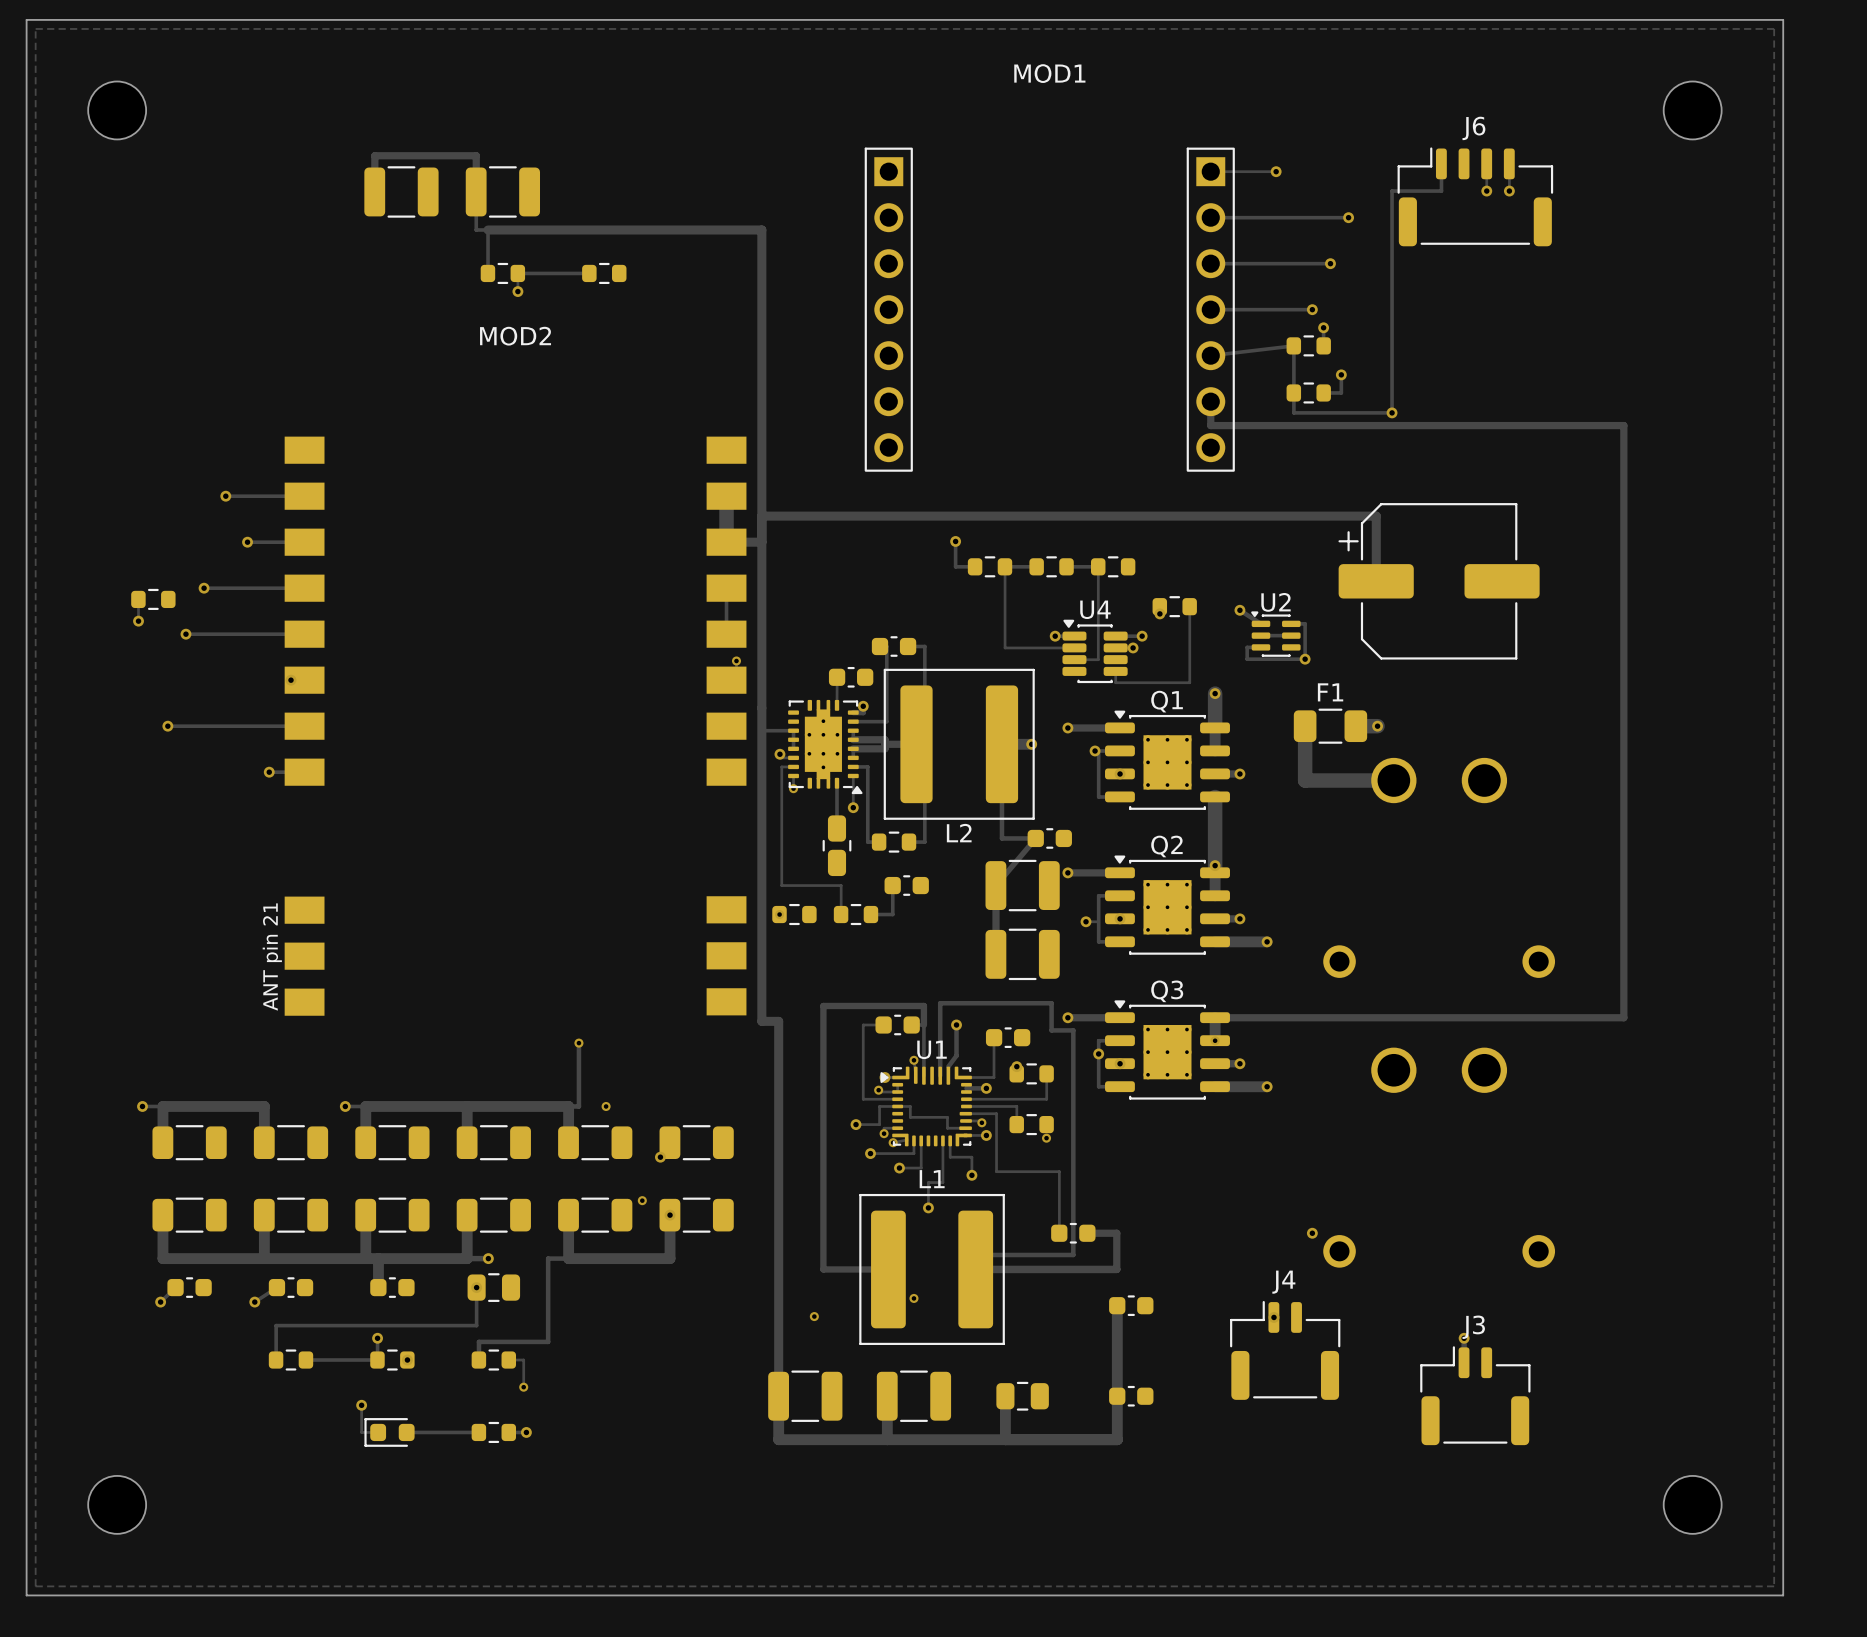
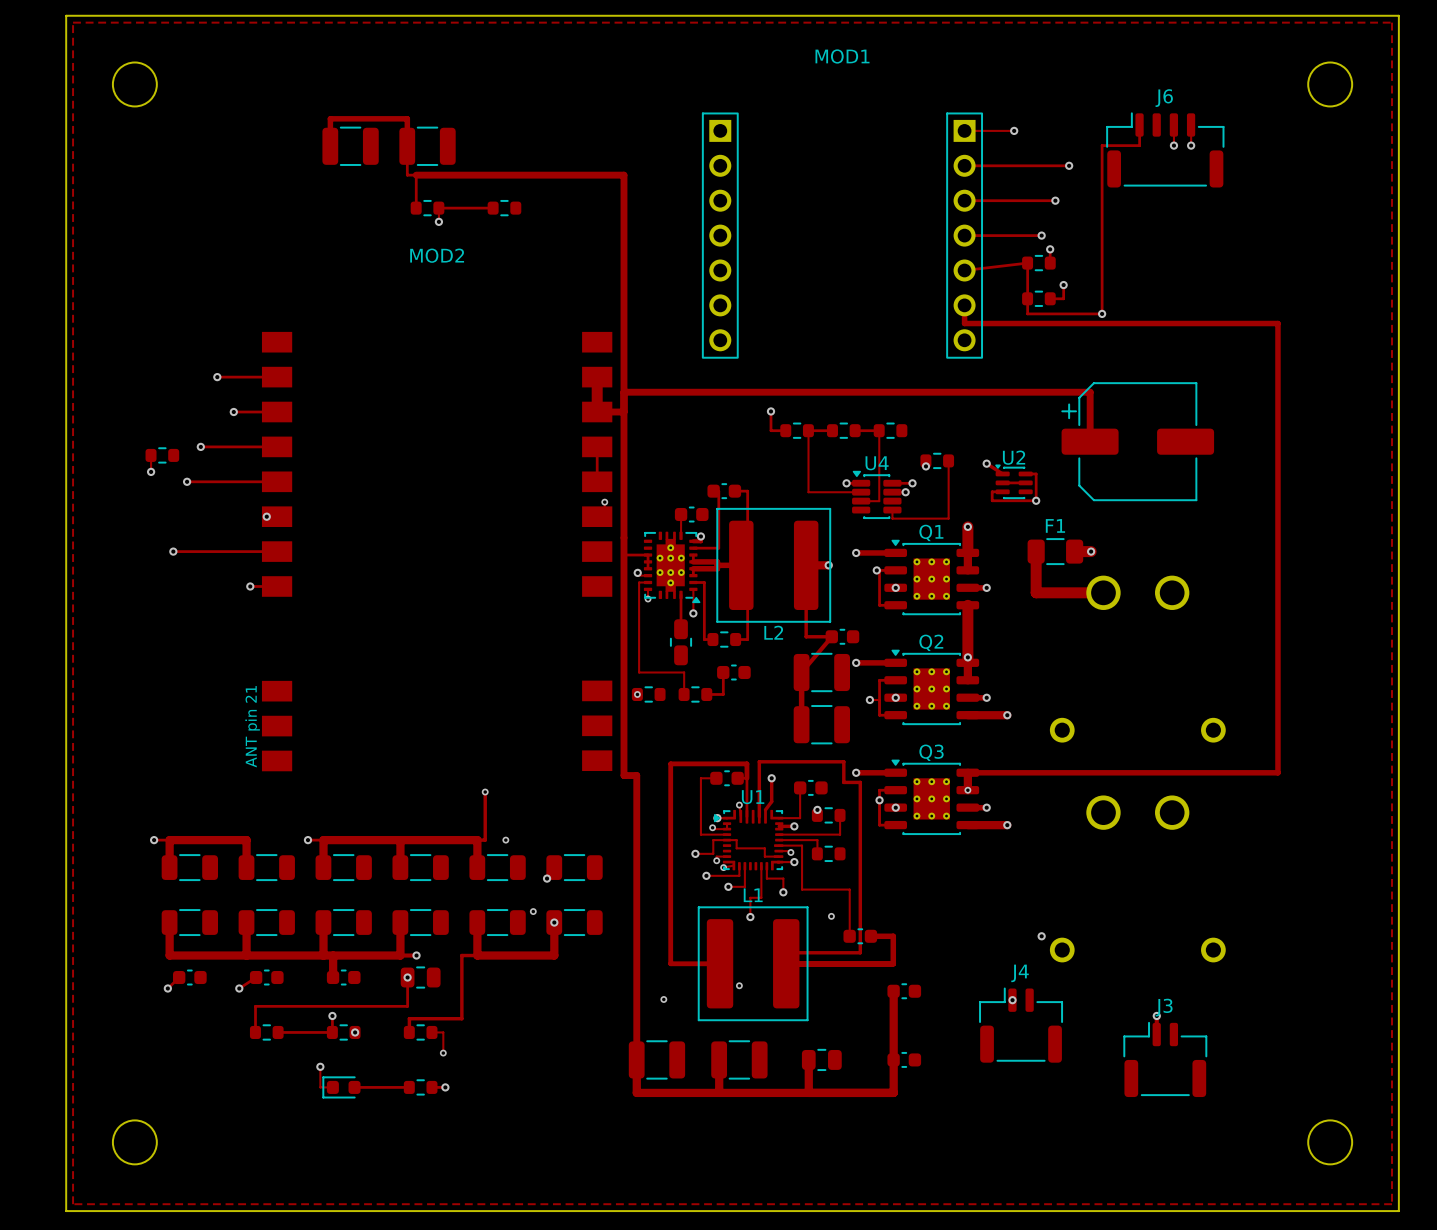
via position: (1046, 1138) -> (831, 916)

